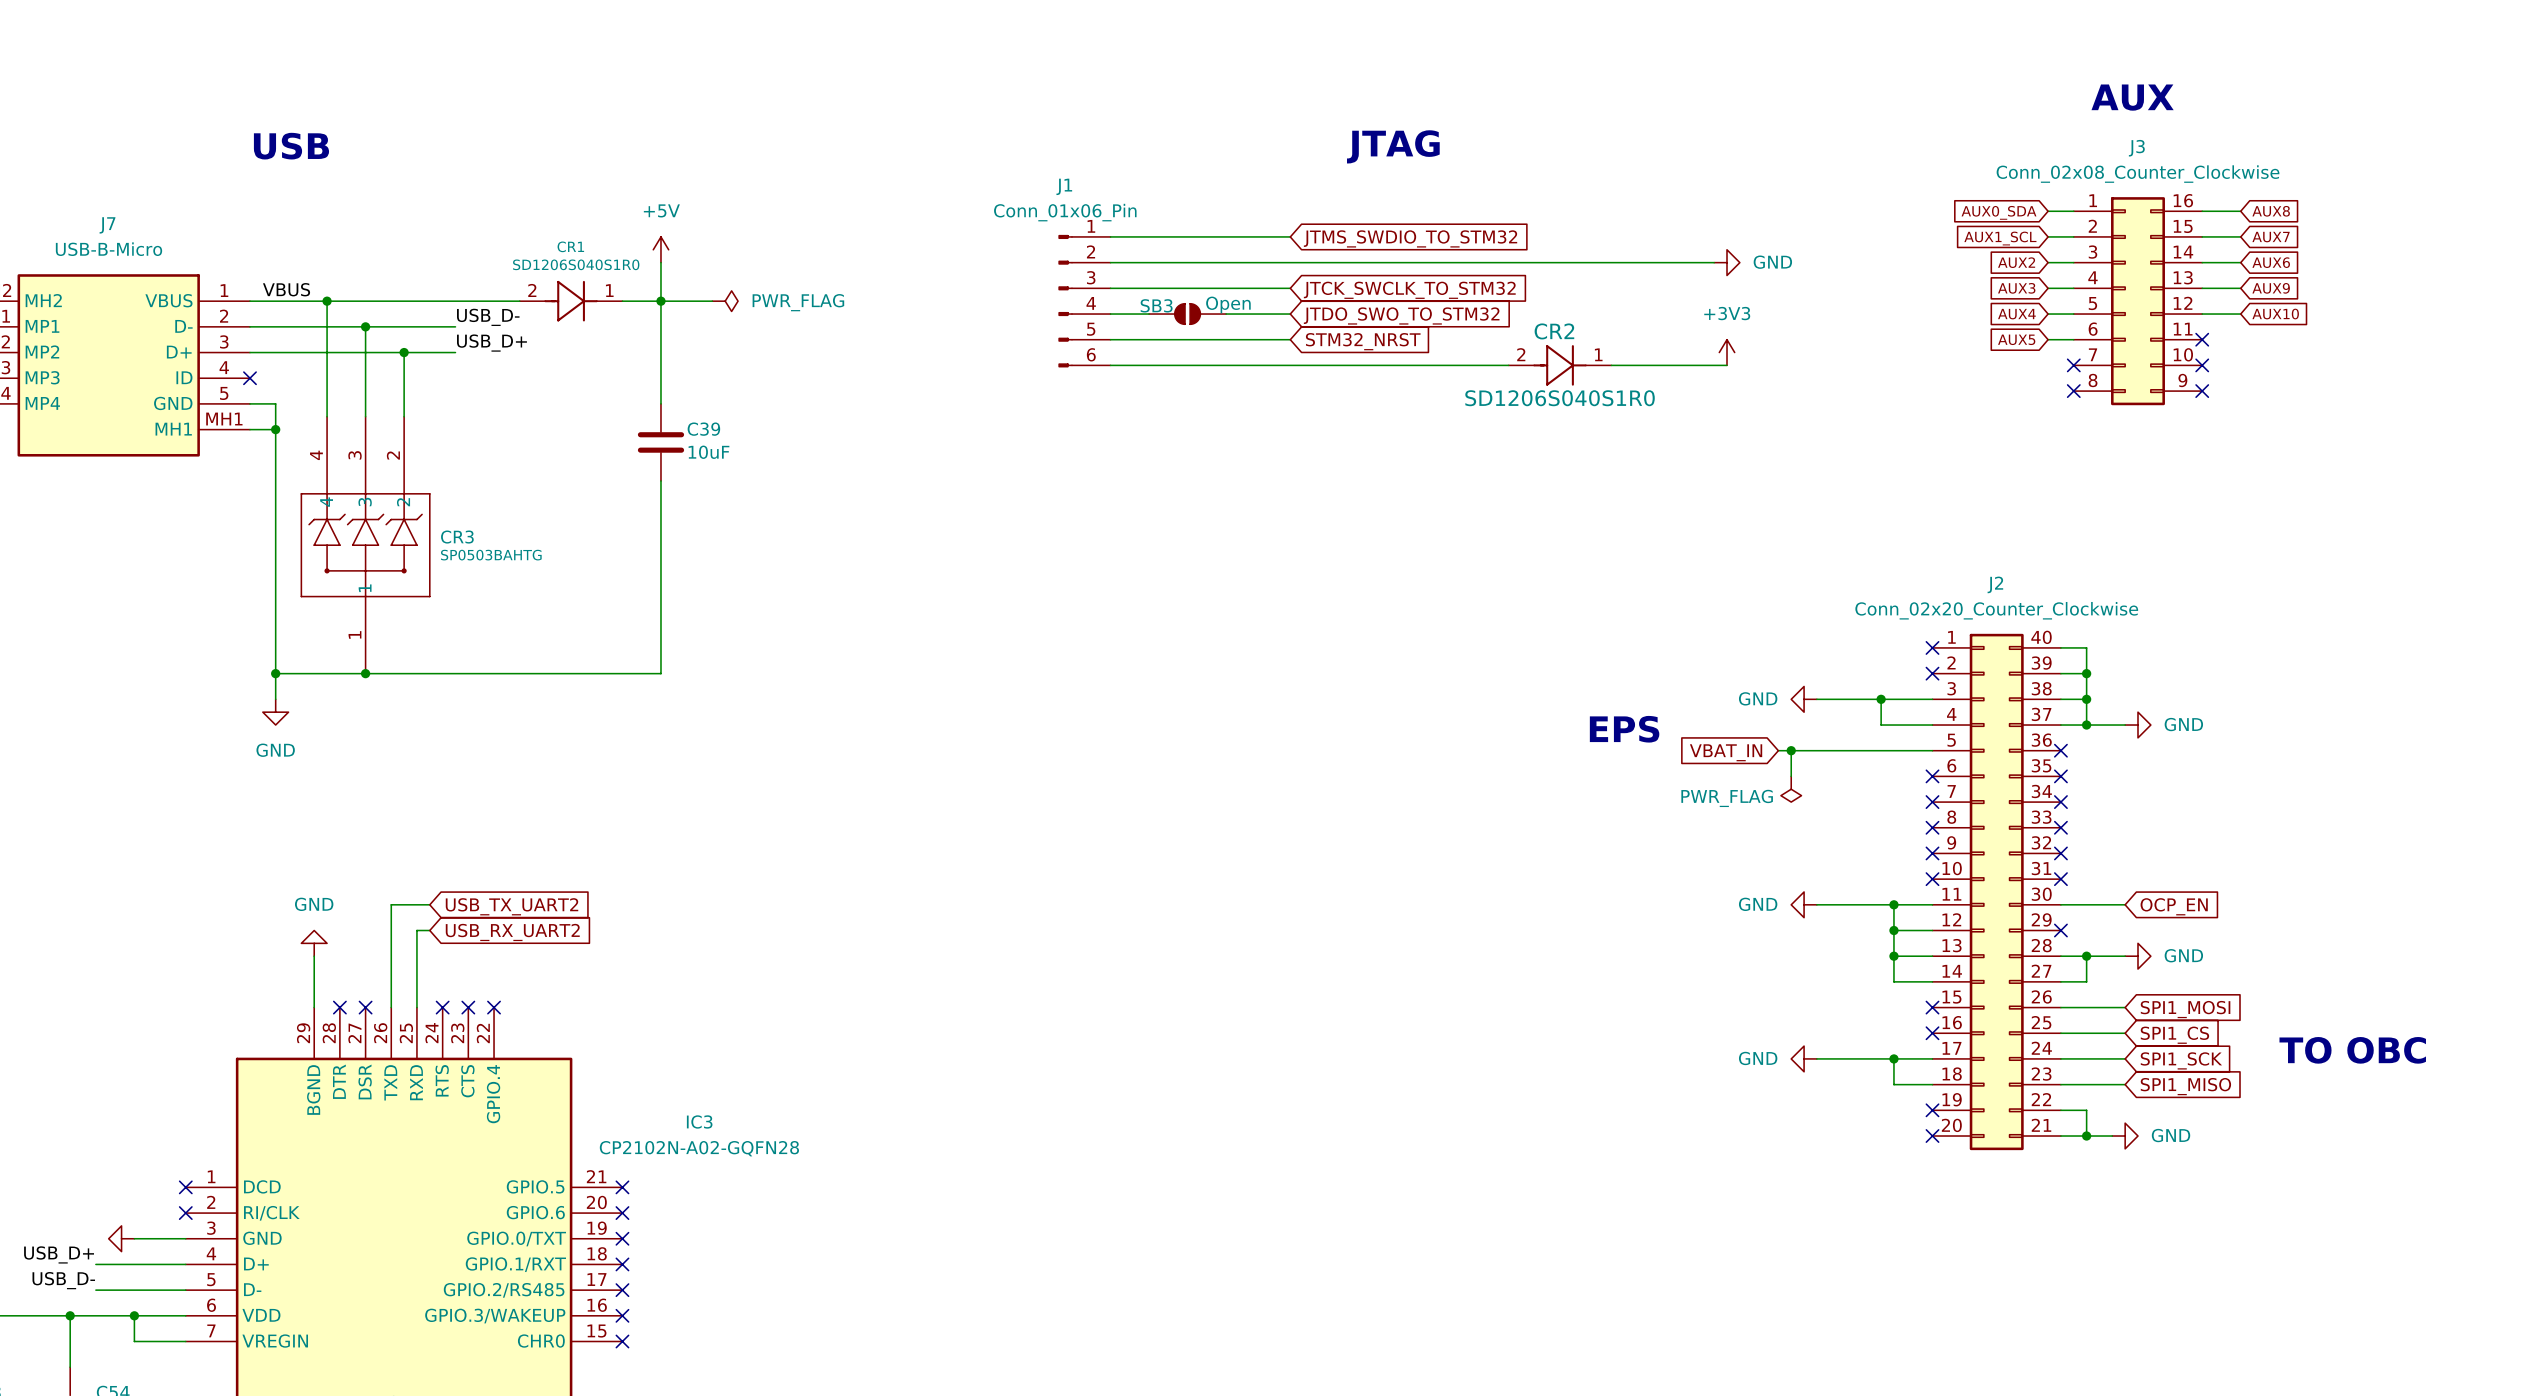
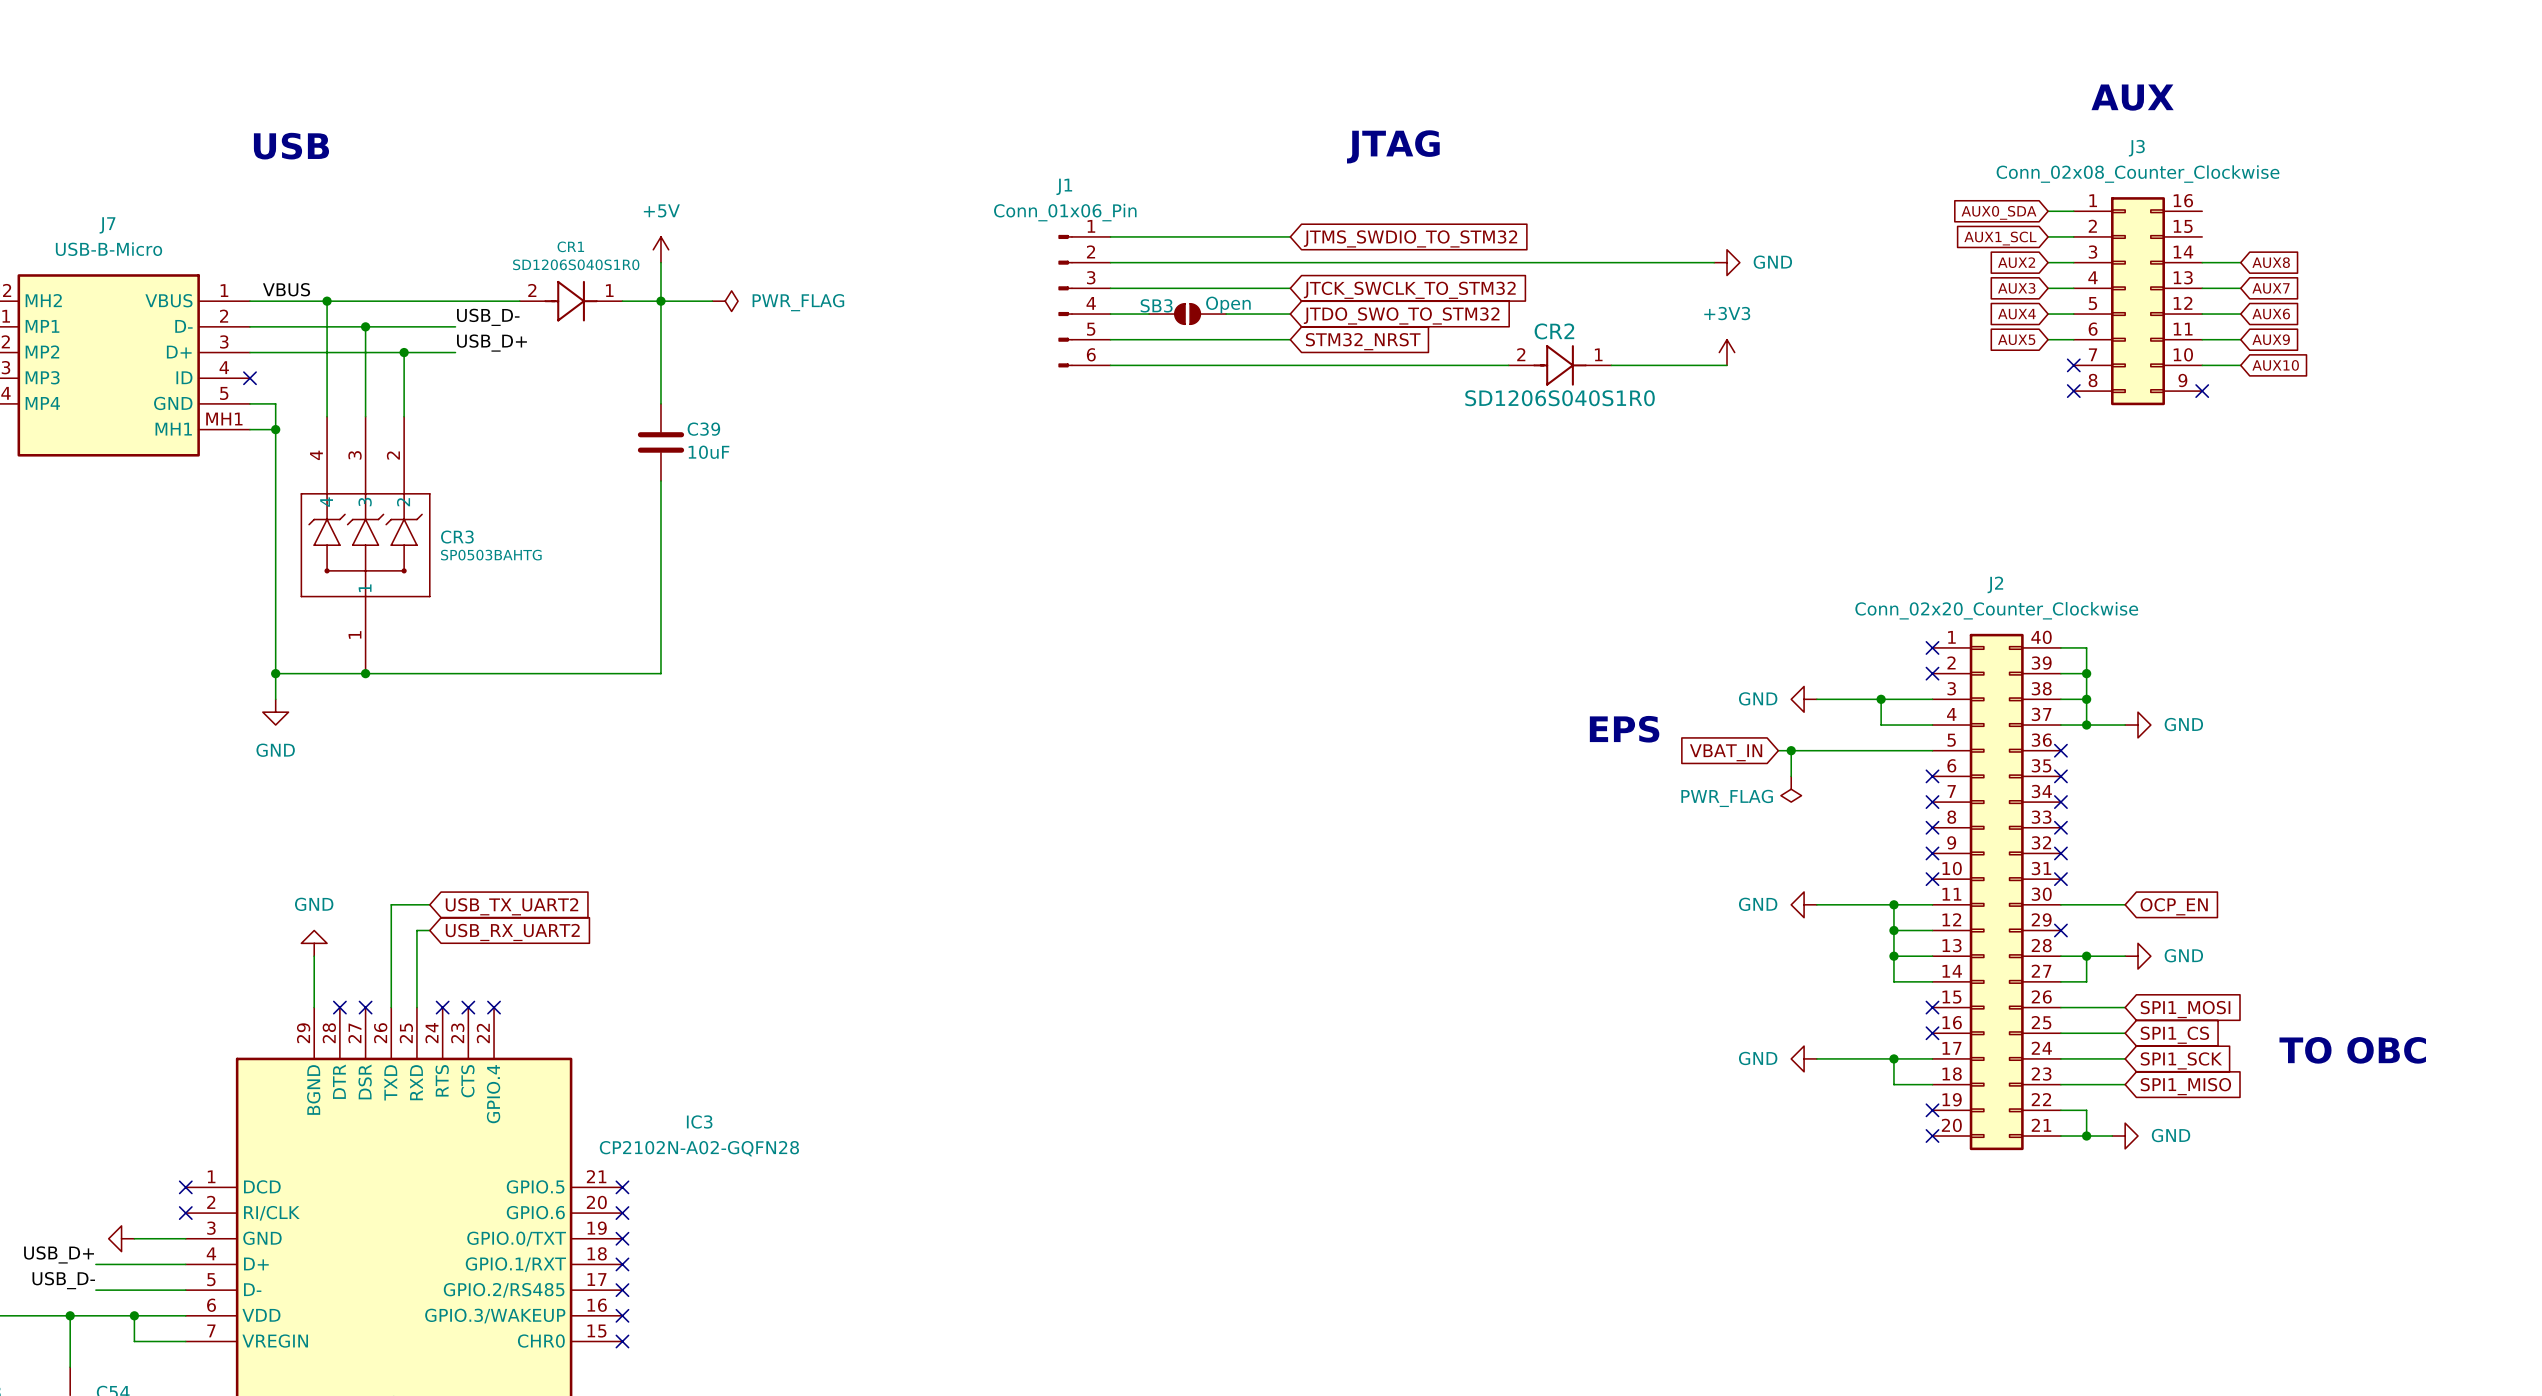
wire: (2202, 211) (2240, 211) -> (2202, 365) (2240, 365)
global label: AUX8 (2271, 211) -> none
wire: (2202, 236) (2240, 236) -> (2202, 339) (2240, 339)
global label: AUX7 (2271, 237) -> none
global label: AUX6 (2271, 262) -> AUX8 (2271, 262)
global label: AUX9 (2271, 288) -> AUX7 (2271, 288)
global label: AUX10 (2275, 314) -> AUX6 (2271, 314)
no-connect mark: (2202, 339) -> none
global label: none -> AUX9 (2271, 339)
no-connect mark: (2202, 365) -> none
global label: none -> AUX10 (2275, 365)

